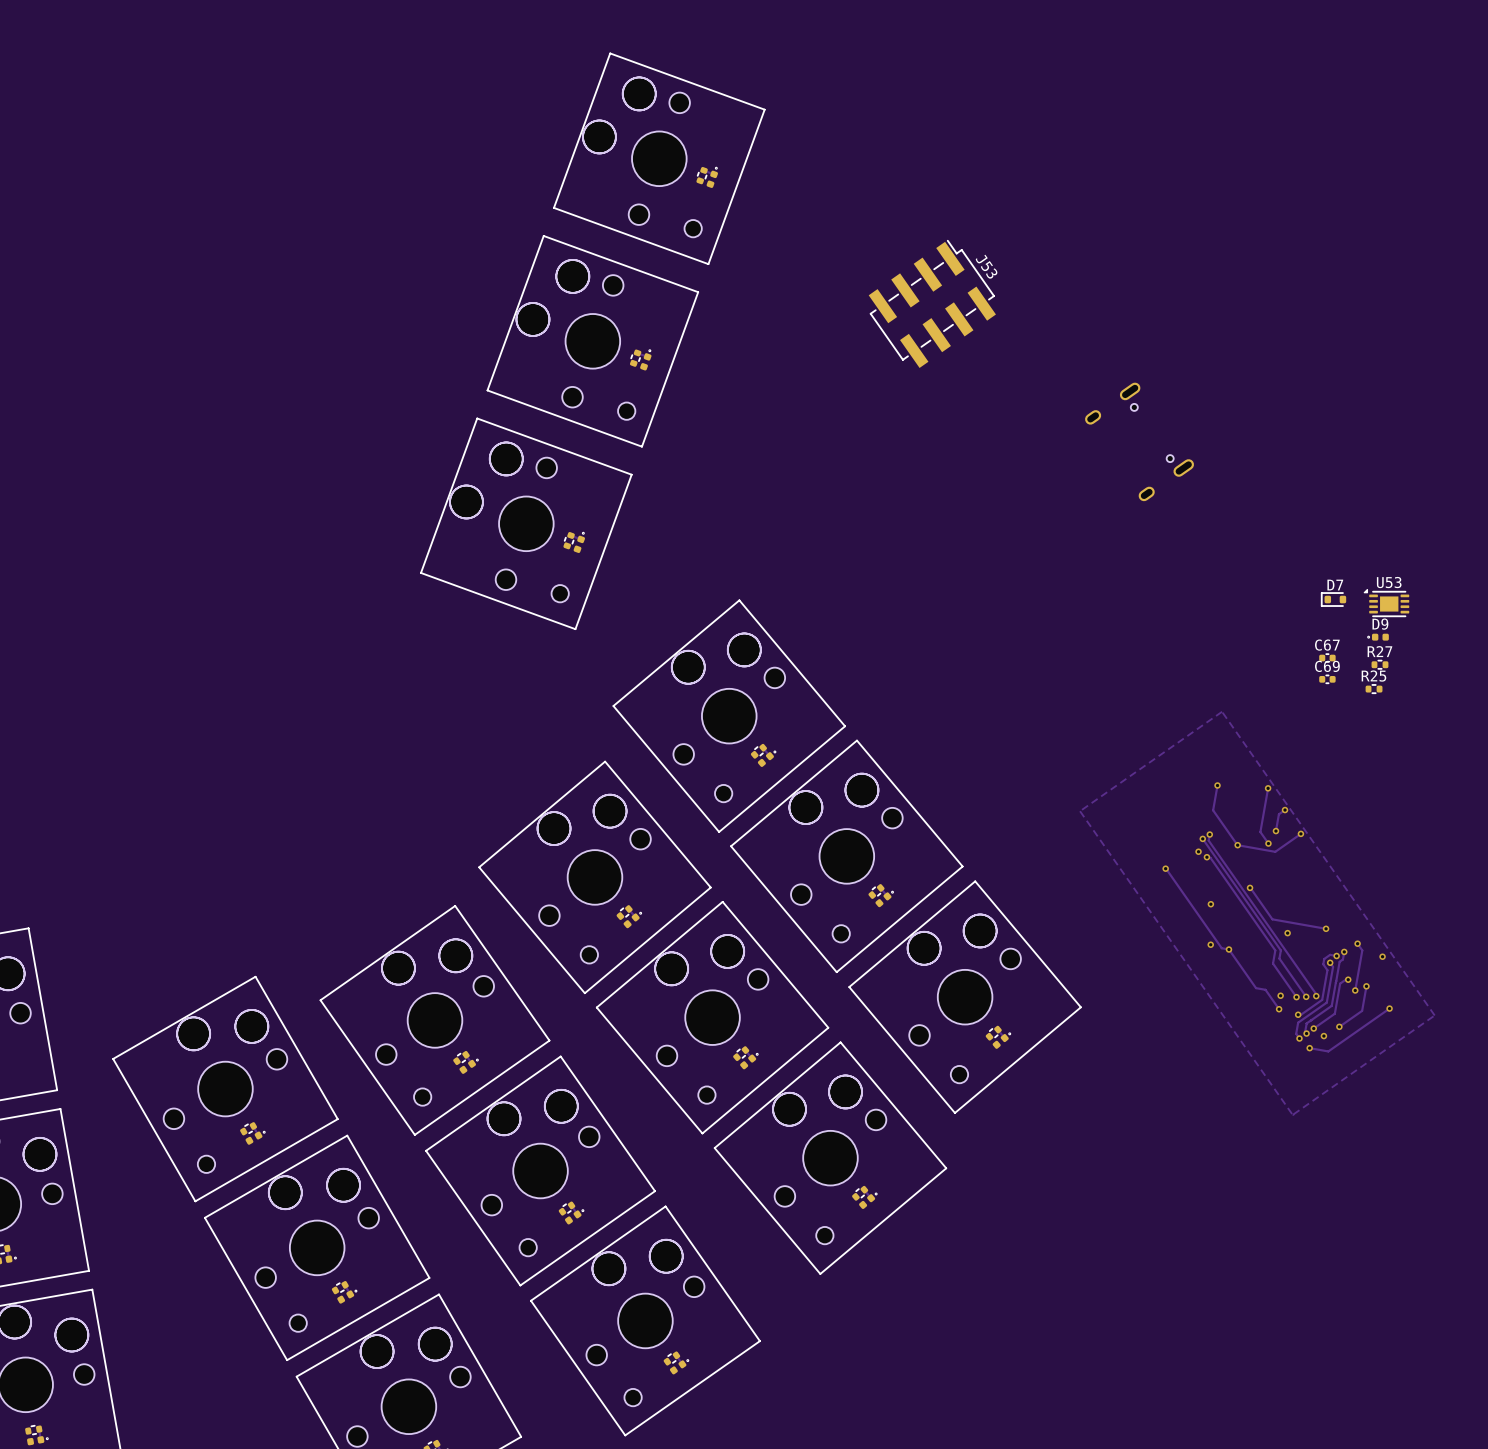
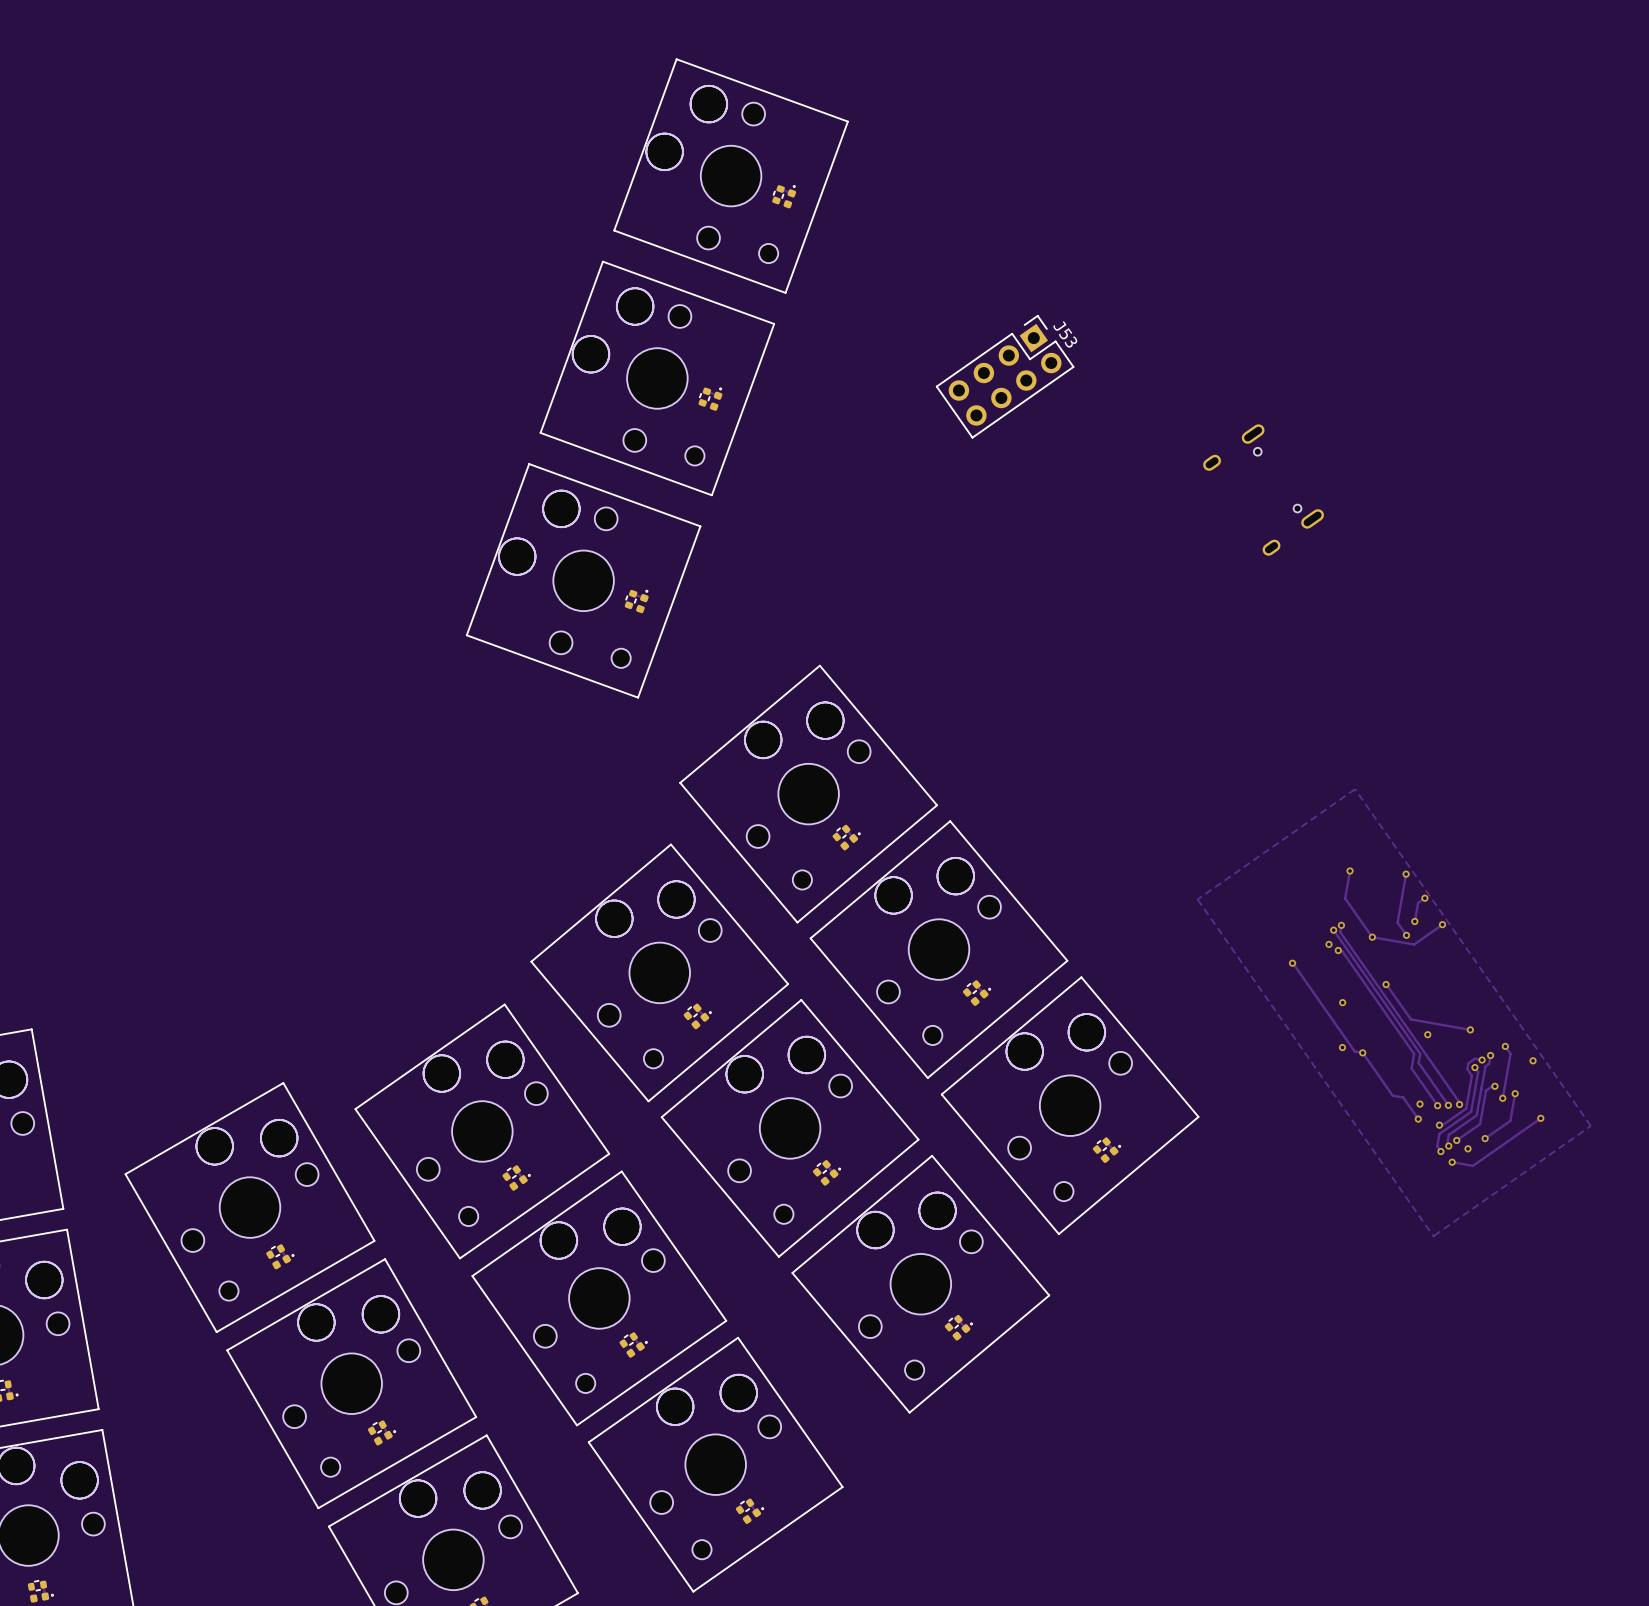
J53 footprint: [868, 240, 996, 368] -> [936, 315, 1075, 439]
D7: (1333, 599) -> none
U53: (1386, 602) -> none
D9: (1378, 637) -> none
C67: (1327, 658) -> none
R27: (1379, 664) -> none
C69: (1327, 679) -> none
R25: (1374, 689) -> none

